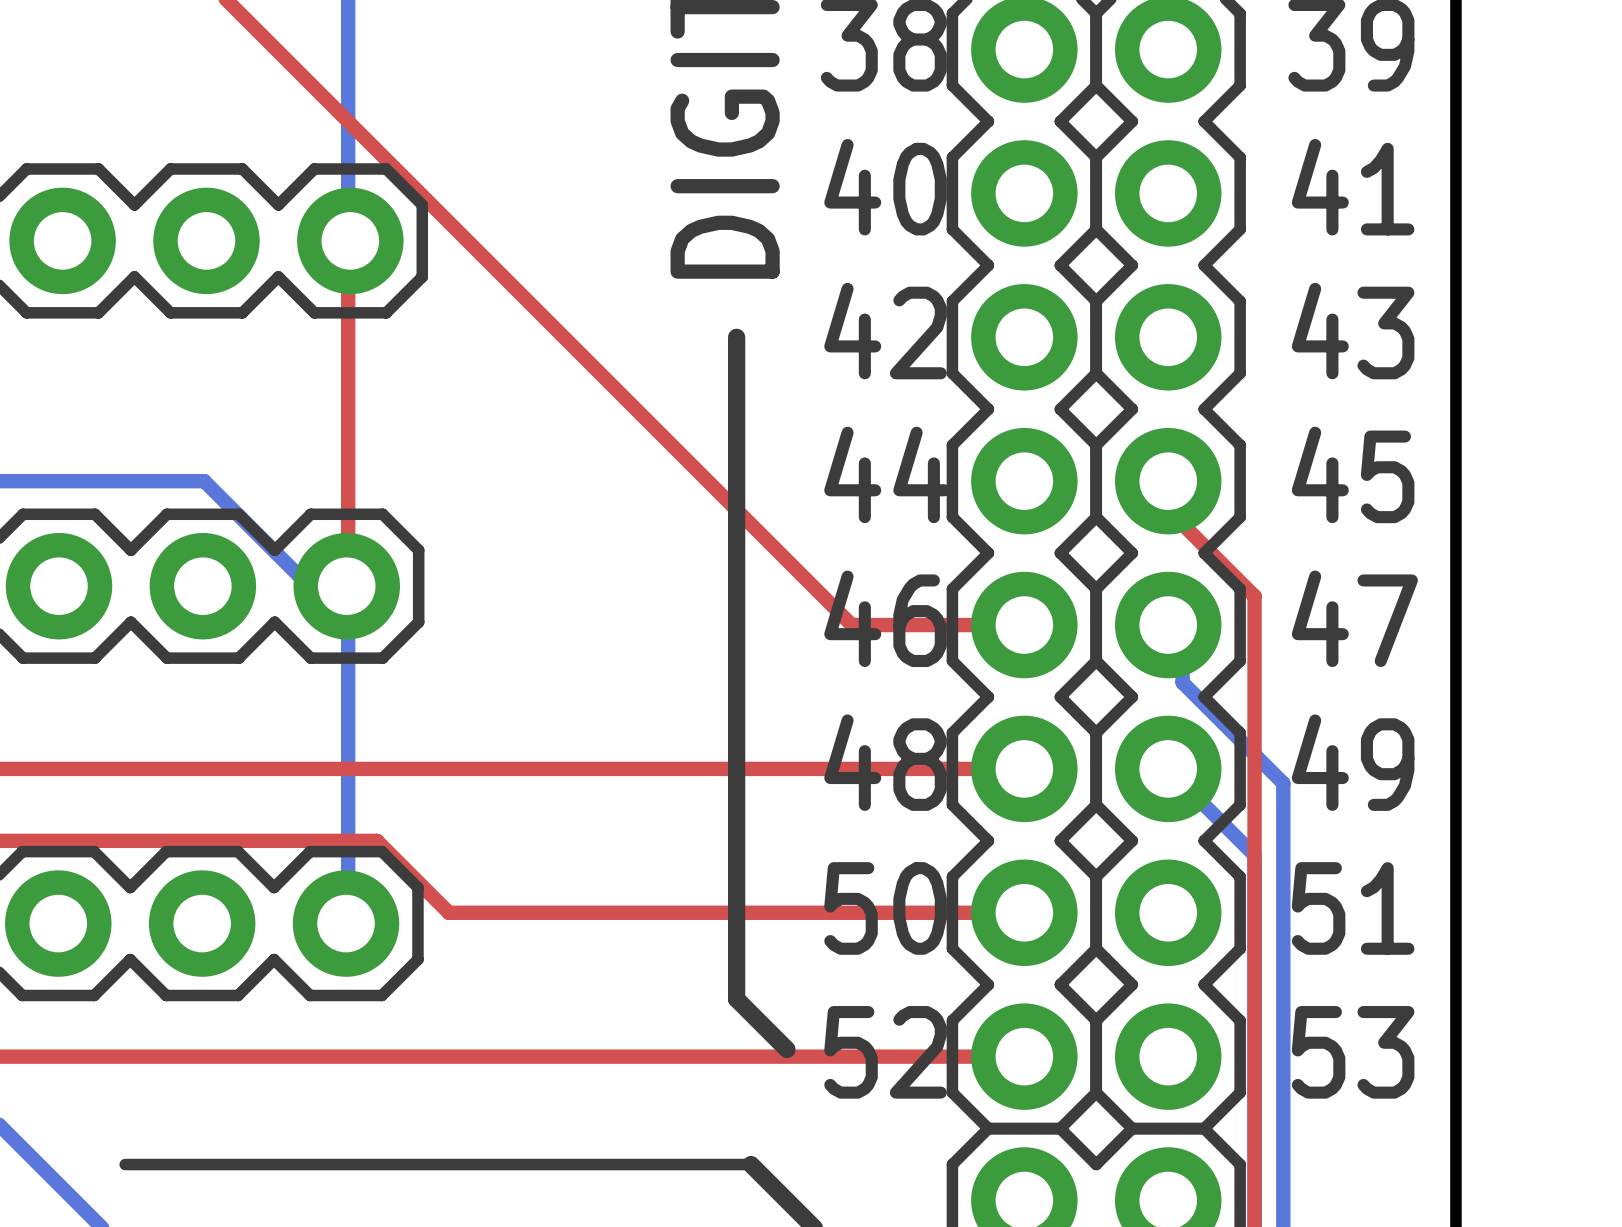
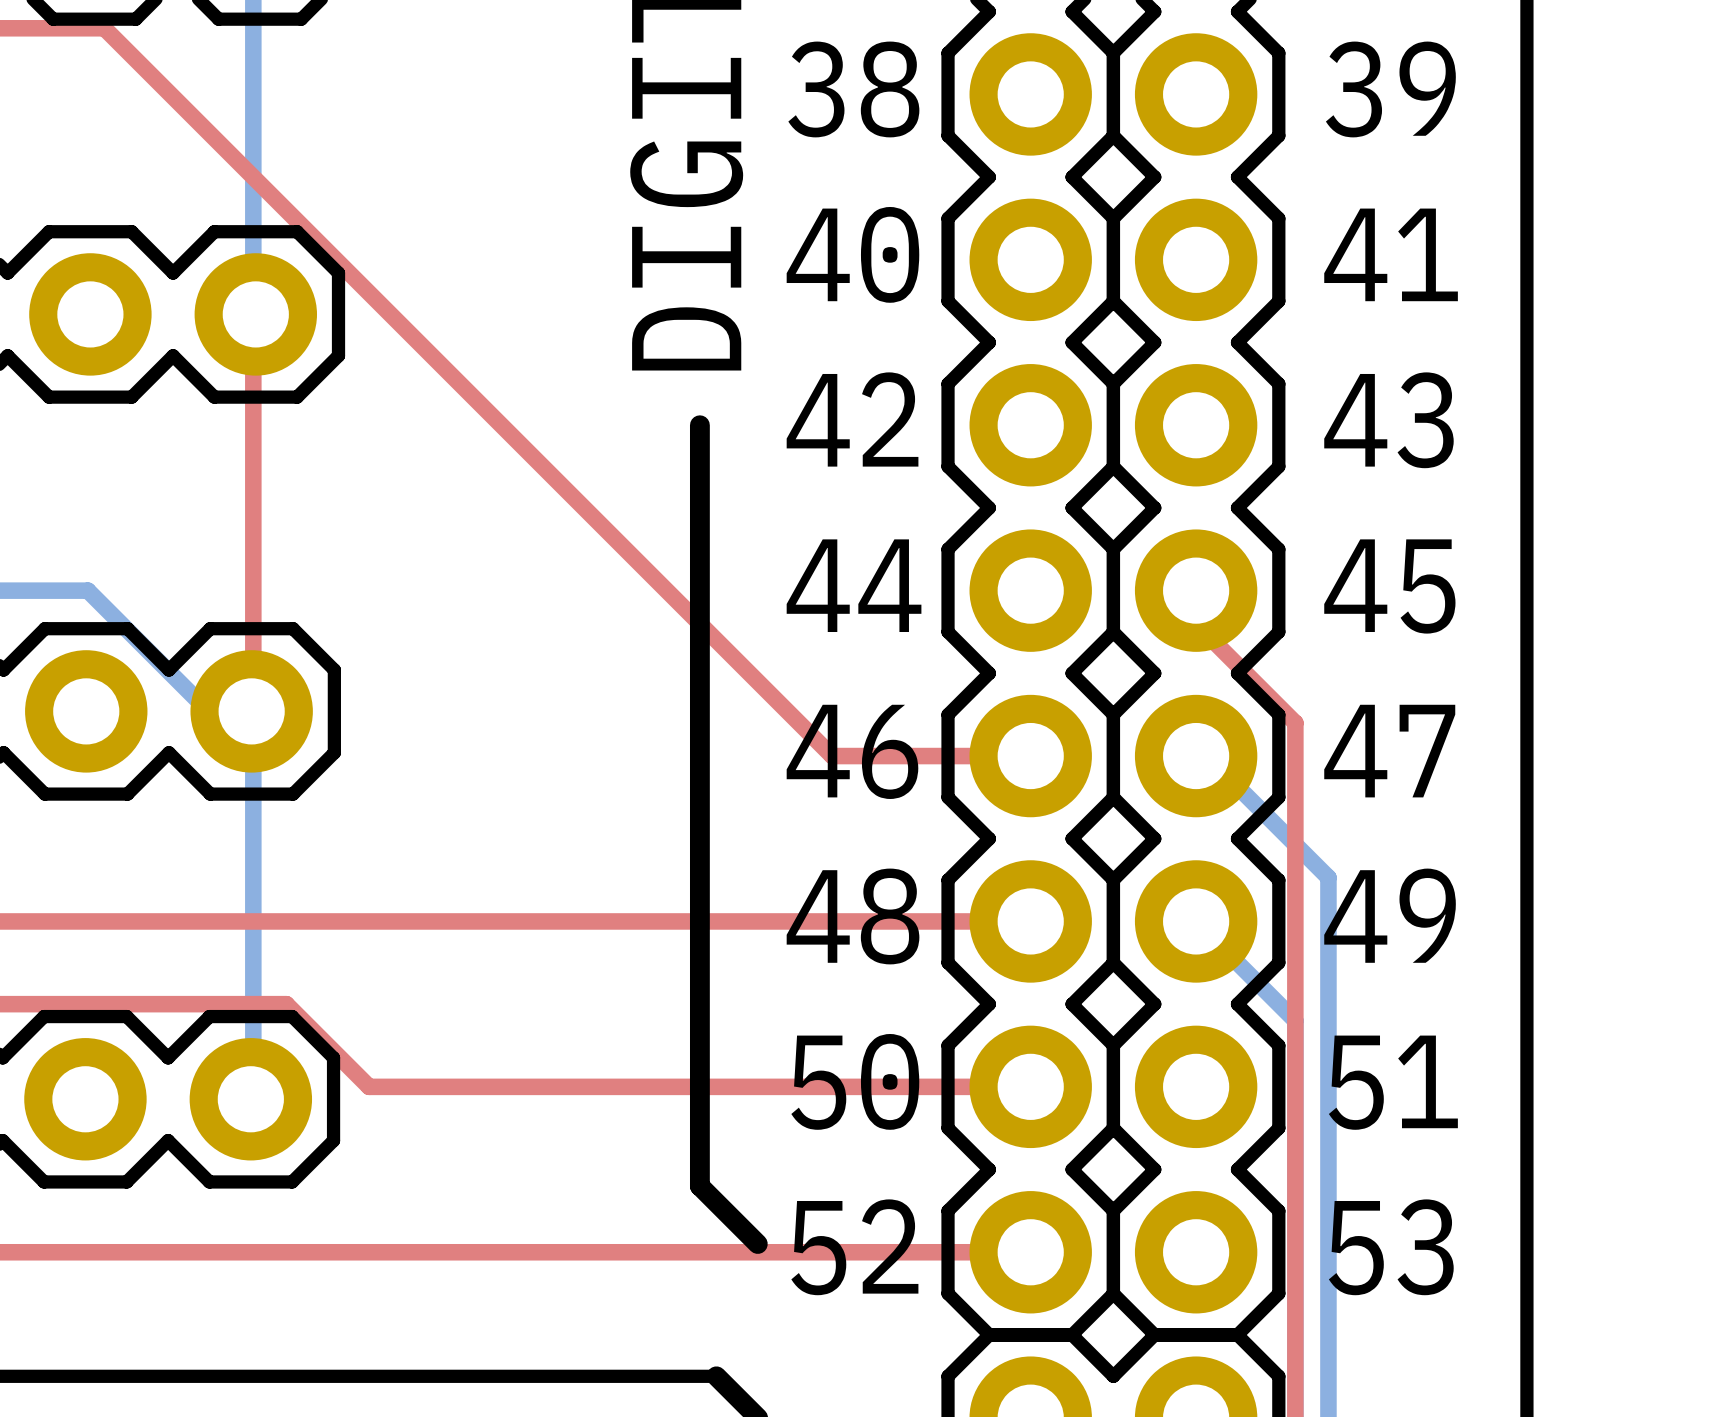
bottom track: (1182, 630) (1182, 682) (1283, 783) -> (1212, 761) (1328, 877) (1328, 937)

